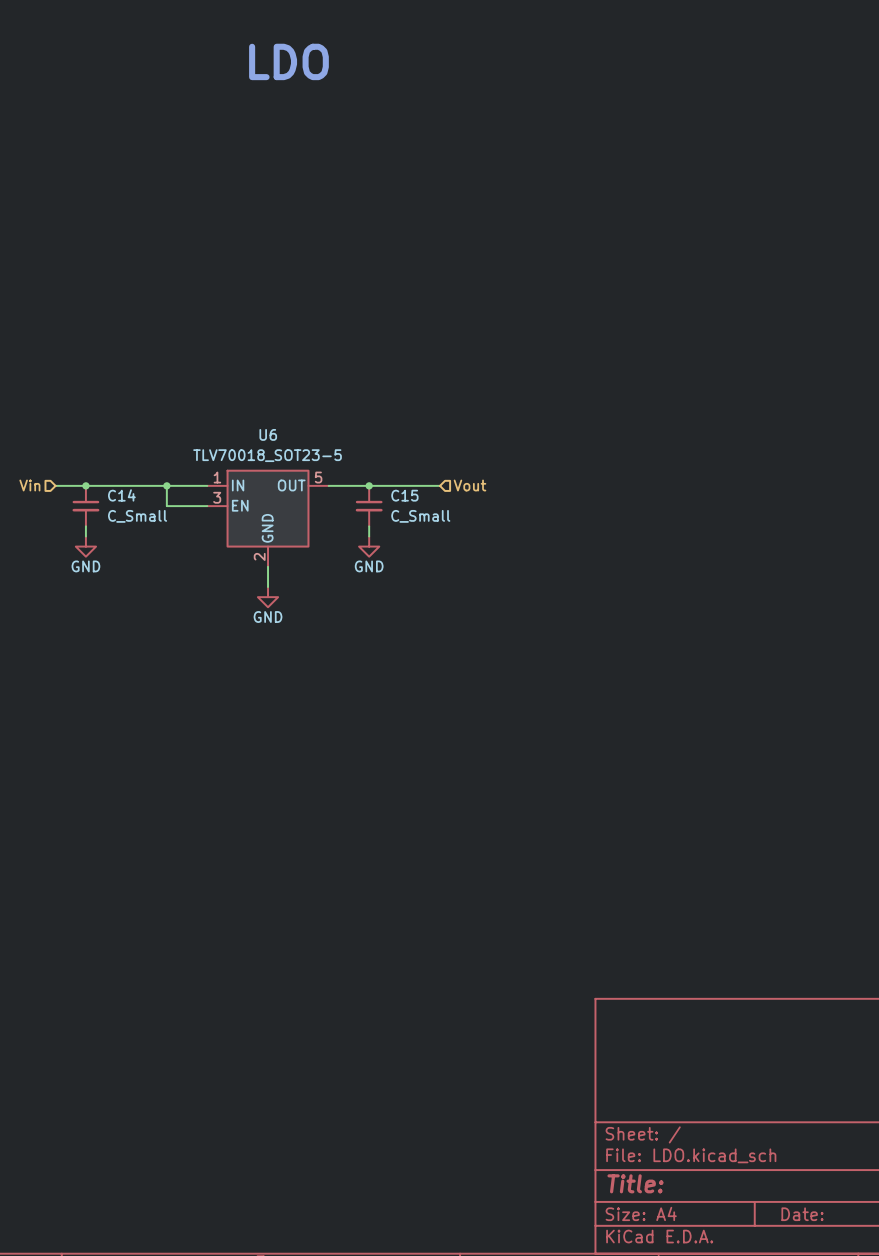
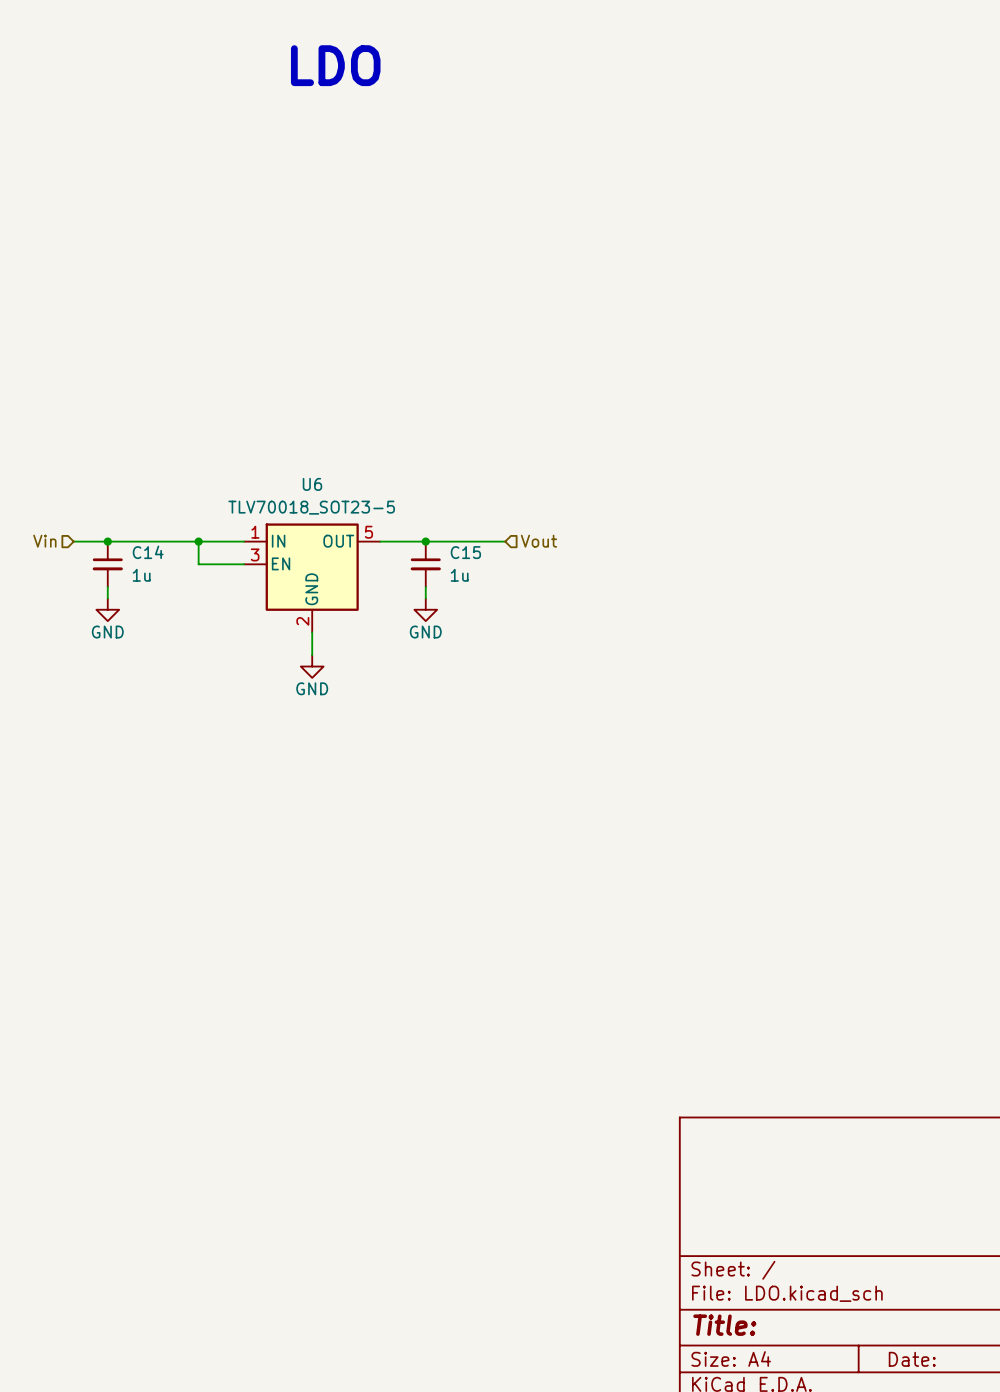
C14 value: C_Small (137, 516) -> 1u (141, 575)
C15 value: C_Small (420, 516) -> 1u (459, 575)

